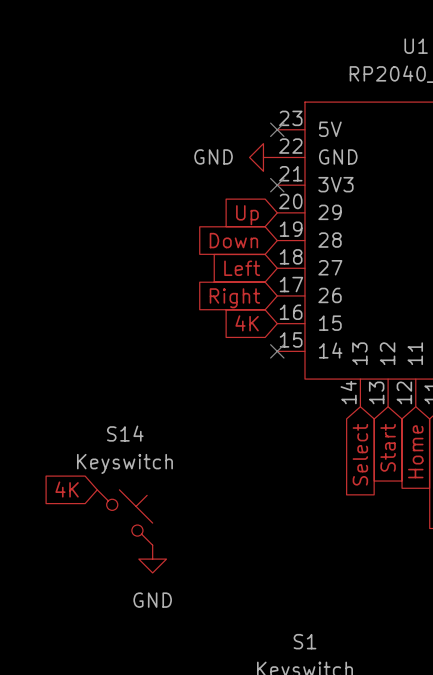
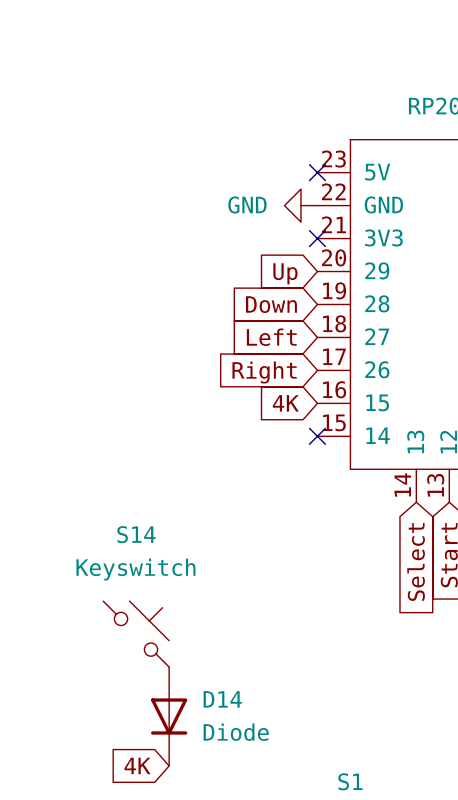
global label position: 4K (67, 489) -> 4K (137, 765)
power symbol: GND (152, 559) -> none
D14: none -> Diode (169, 716)

